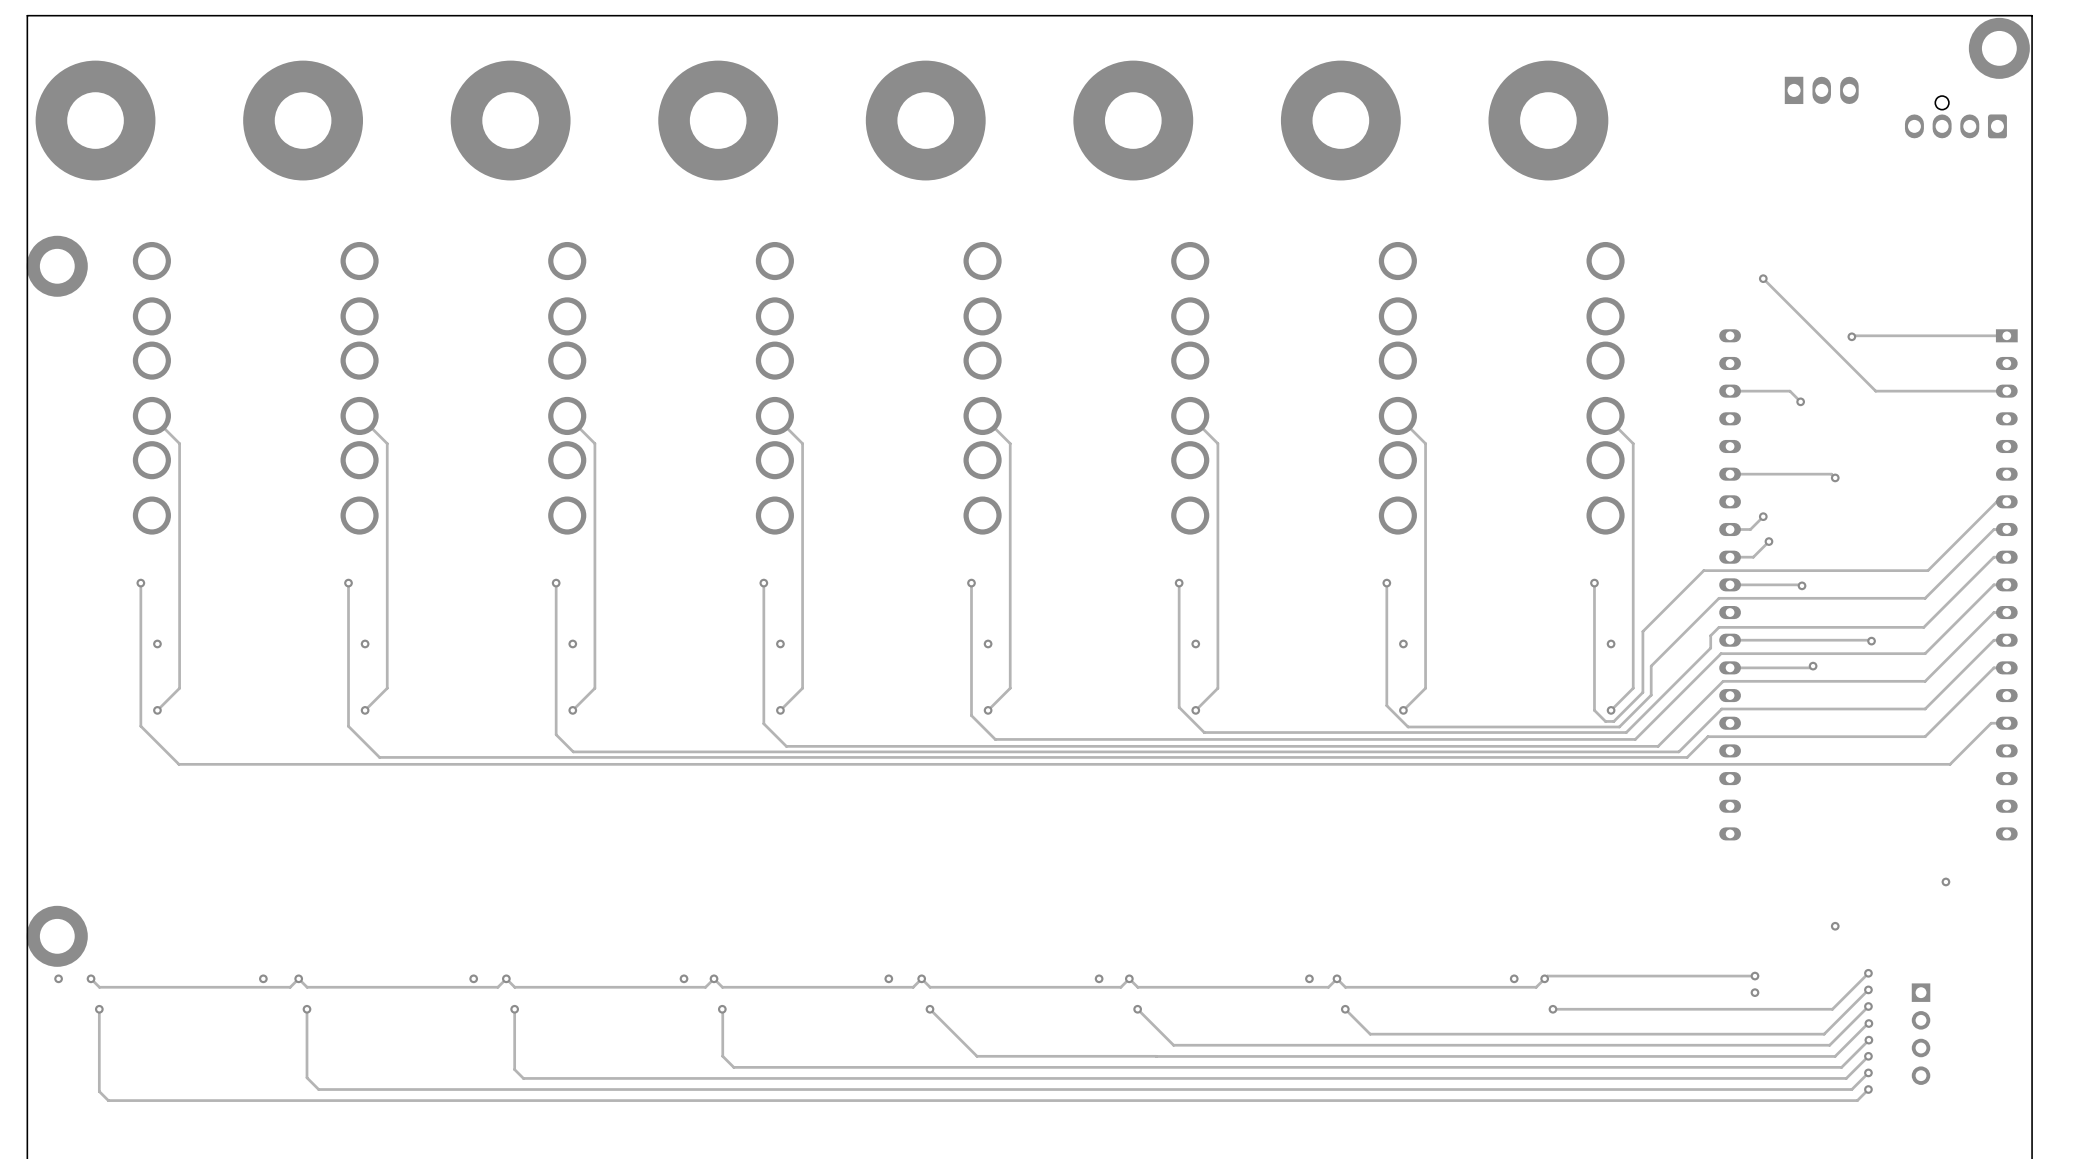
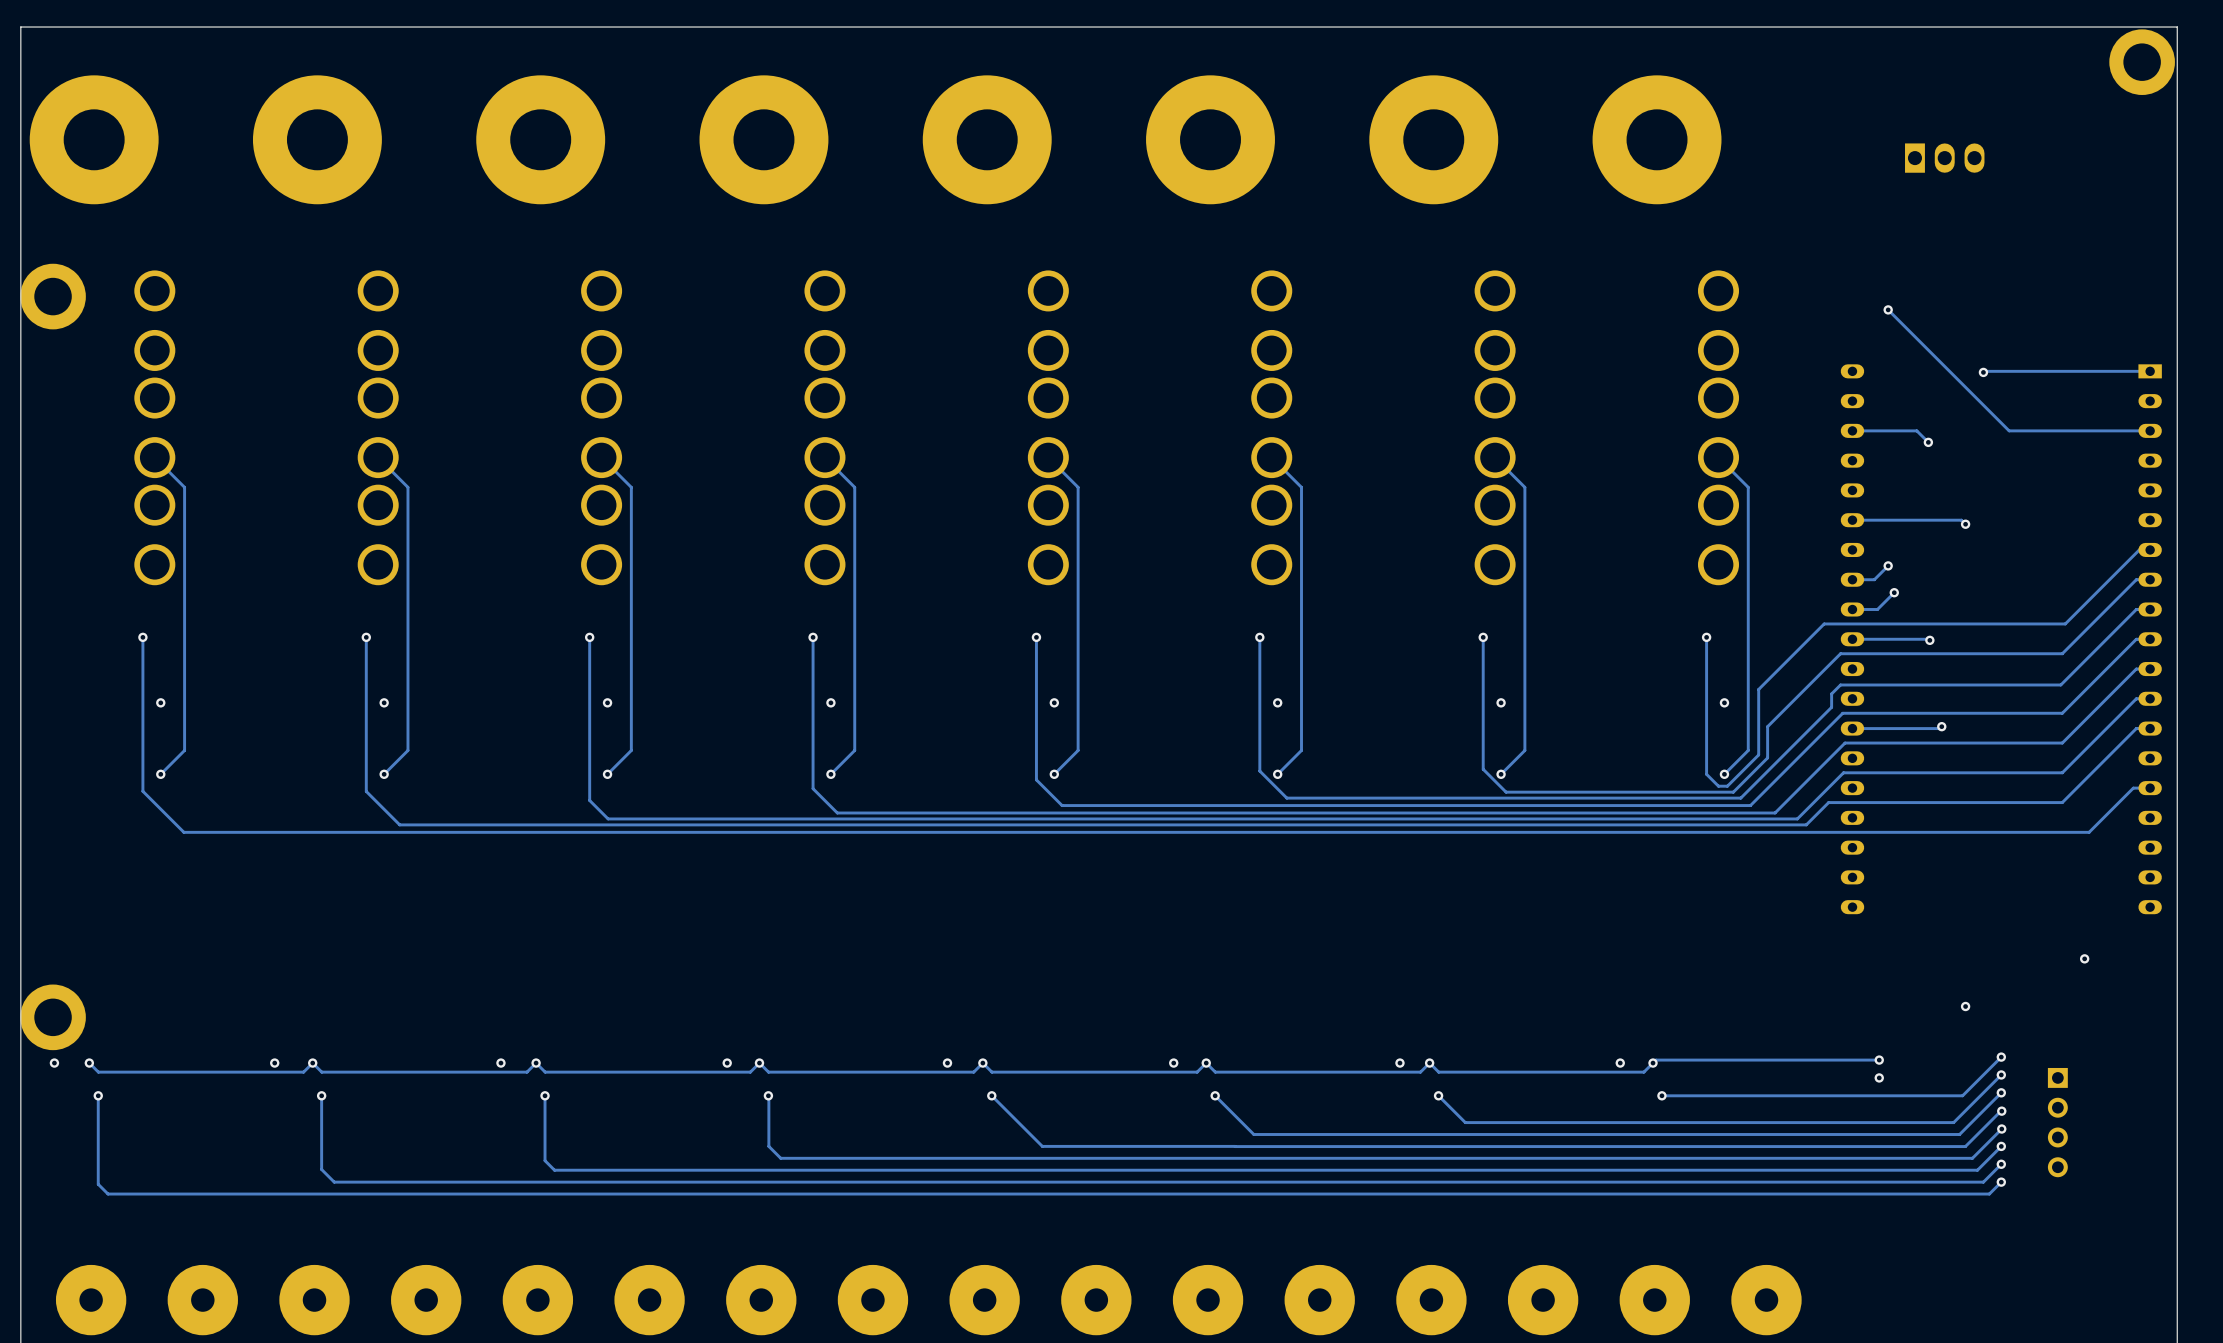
part position: (1821, 90) -> (1944, 158)
part: (1955, 117) -> none
track: (1730, 640) (1871, 641) -> none
via: (1871, 641) -> none

